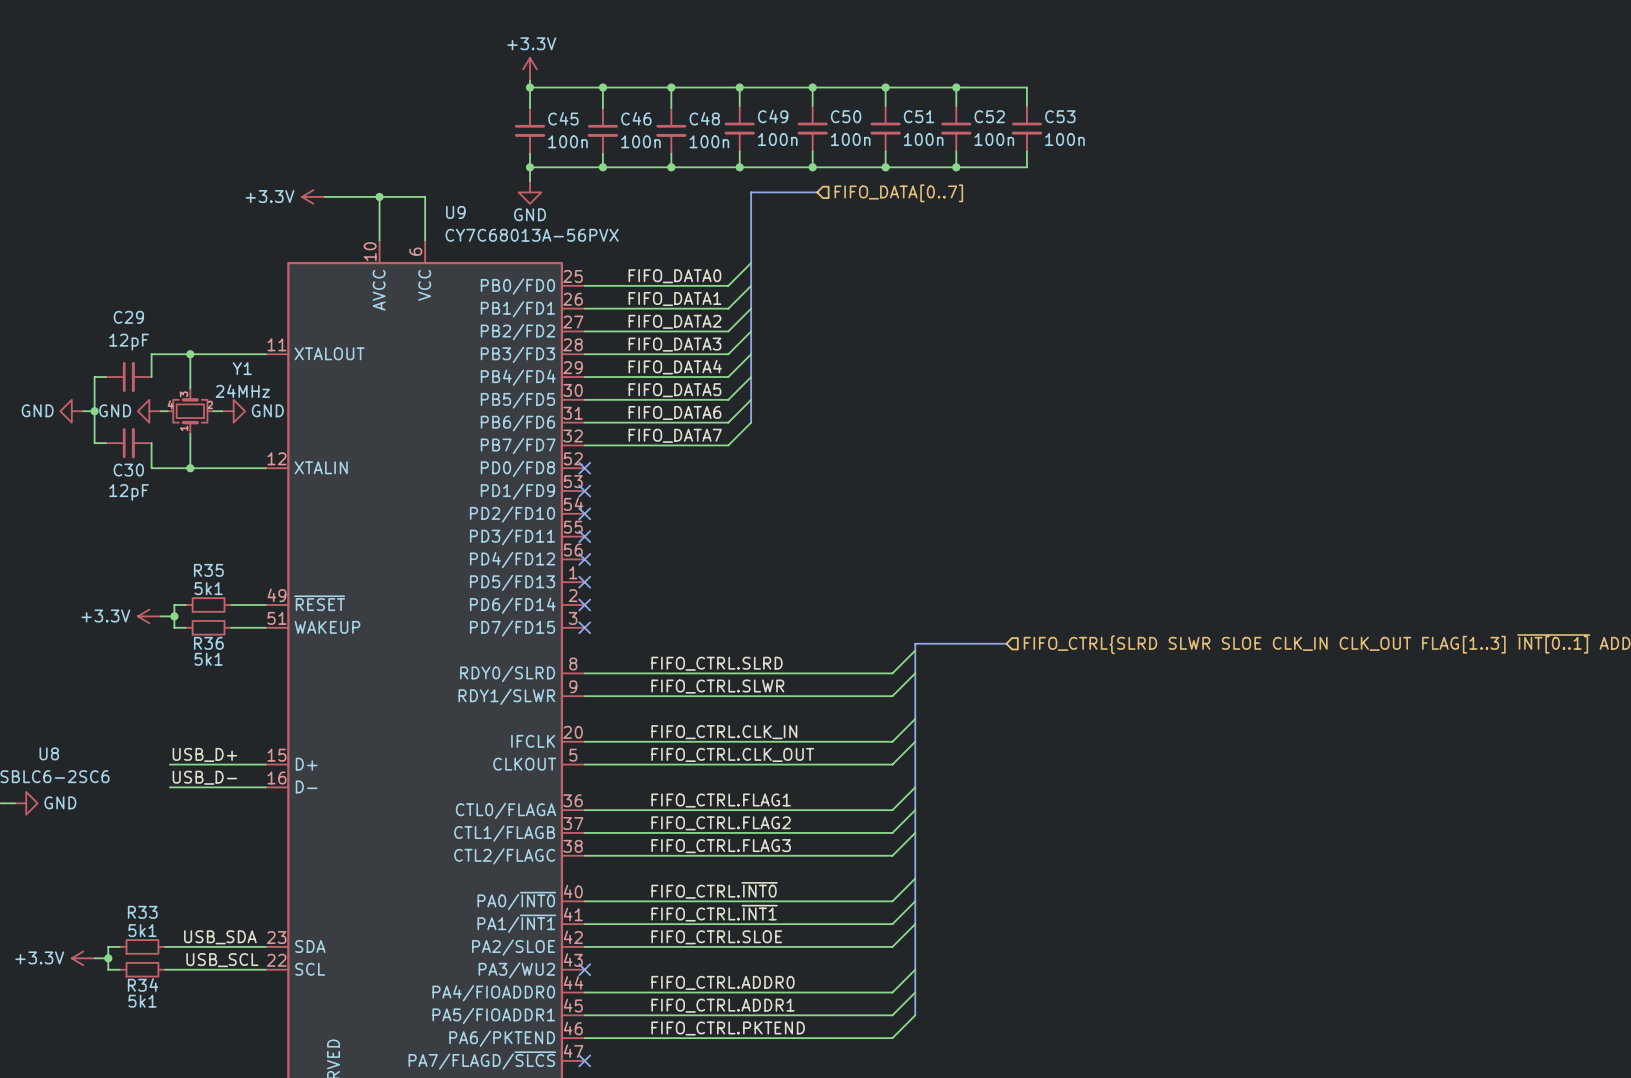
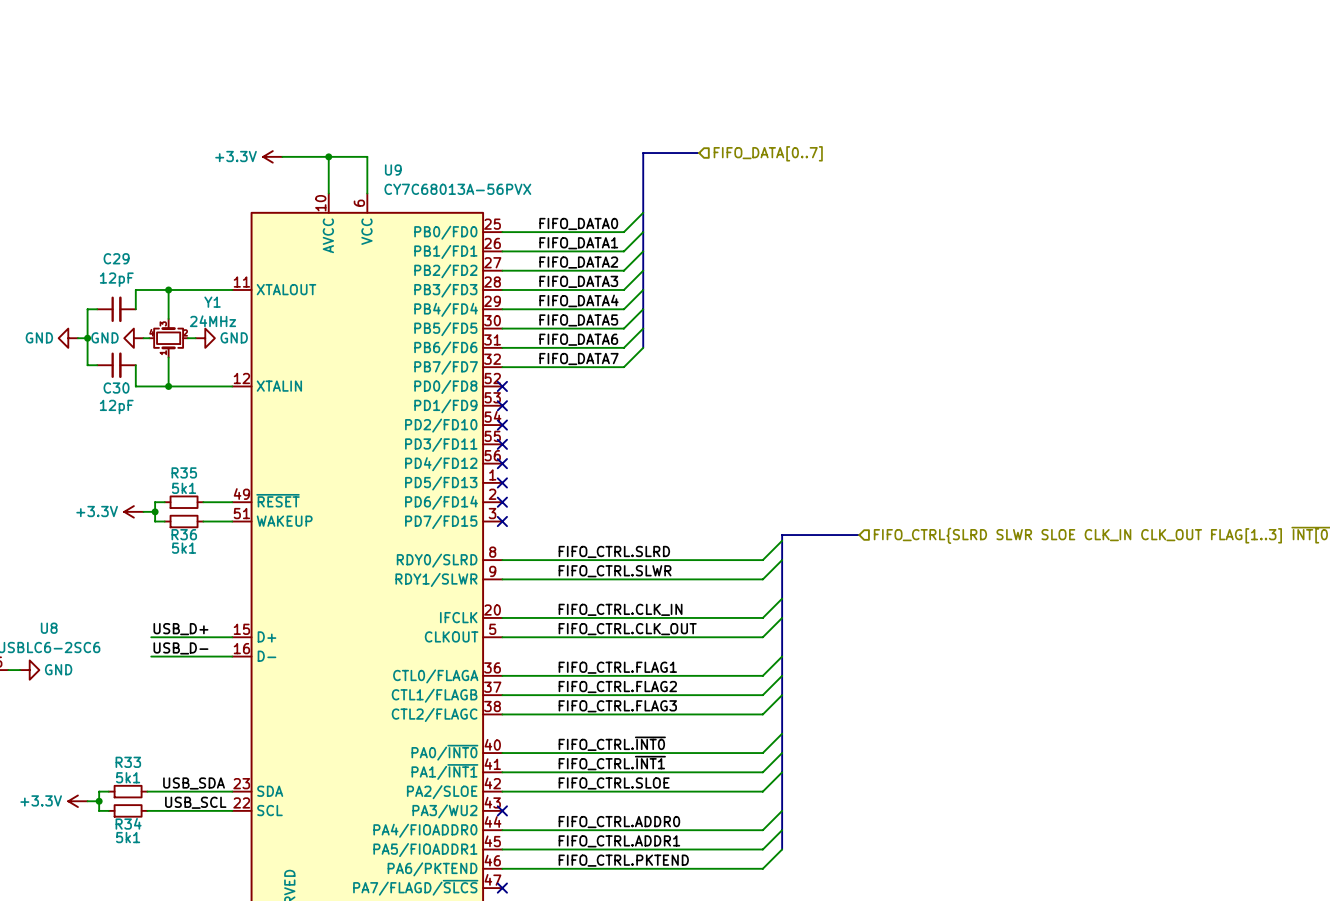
power symbol: +3.3V (530, 69) -> none
wire: (530, 80) (530, 108) -> none
wire: (530, 87) (1026, 87) (1026, 105) -> none
junction: (530, 87) -> none
wire: (602, 87) (602, 108) -> none
junction: (602, 87) -> none
wire: (671, 87) (671, 108) -> none
junction: (671, 87) -> none
wire: (739, 87) (739, 105) -> none
junction: (739, 87) -> none
wire: (812, 87) (812, 105) -> none
junction: (812, 87) -> none
wire: (885, 87) (885, 105) -> none
junction: (885, 87) -> none
wire: (956, 87) (956, 105) -> none
junction: (956, 87) -> none
C49: 100n (739, 128) -> none
C50: 100n (812, 128) -> none
C51: 100n (885, 128) -> none
C52: 100n (956, 128) -> none
C53: 100n (1026, 128) -> none
C45: 100n (530, 130) -> none
C46: 100n (602, 130) -> none
C48: 100n (671, 130) -> none
wire: (739, 151) (739, 167) -> none
wire: (812, 151) (812, 167) -> none
wire: (885, 151) (885, 167) -> none
wire: (956, 151) (956, 167) -> none
wire: (1026, 151) (1026, 167) (530, 167) -> none
wire: (530, 153) (530, 180) -> none
wire: (602, 153) (602, 167) -> none
wire: (671, 153) (671, 167) -> none
junction: (530, 167) -> none
junction: (602, 167) -> none
junction: (671, 167) -> none
junction: (739, 167) -> none
junction: (812, 167) -> none
junction: (885, 167) -> none
junction: (956, 167) -> none
power symbol: GND (530, 192) -> none

